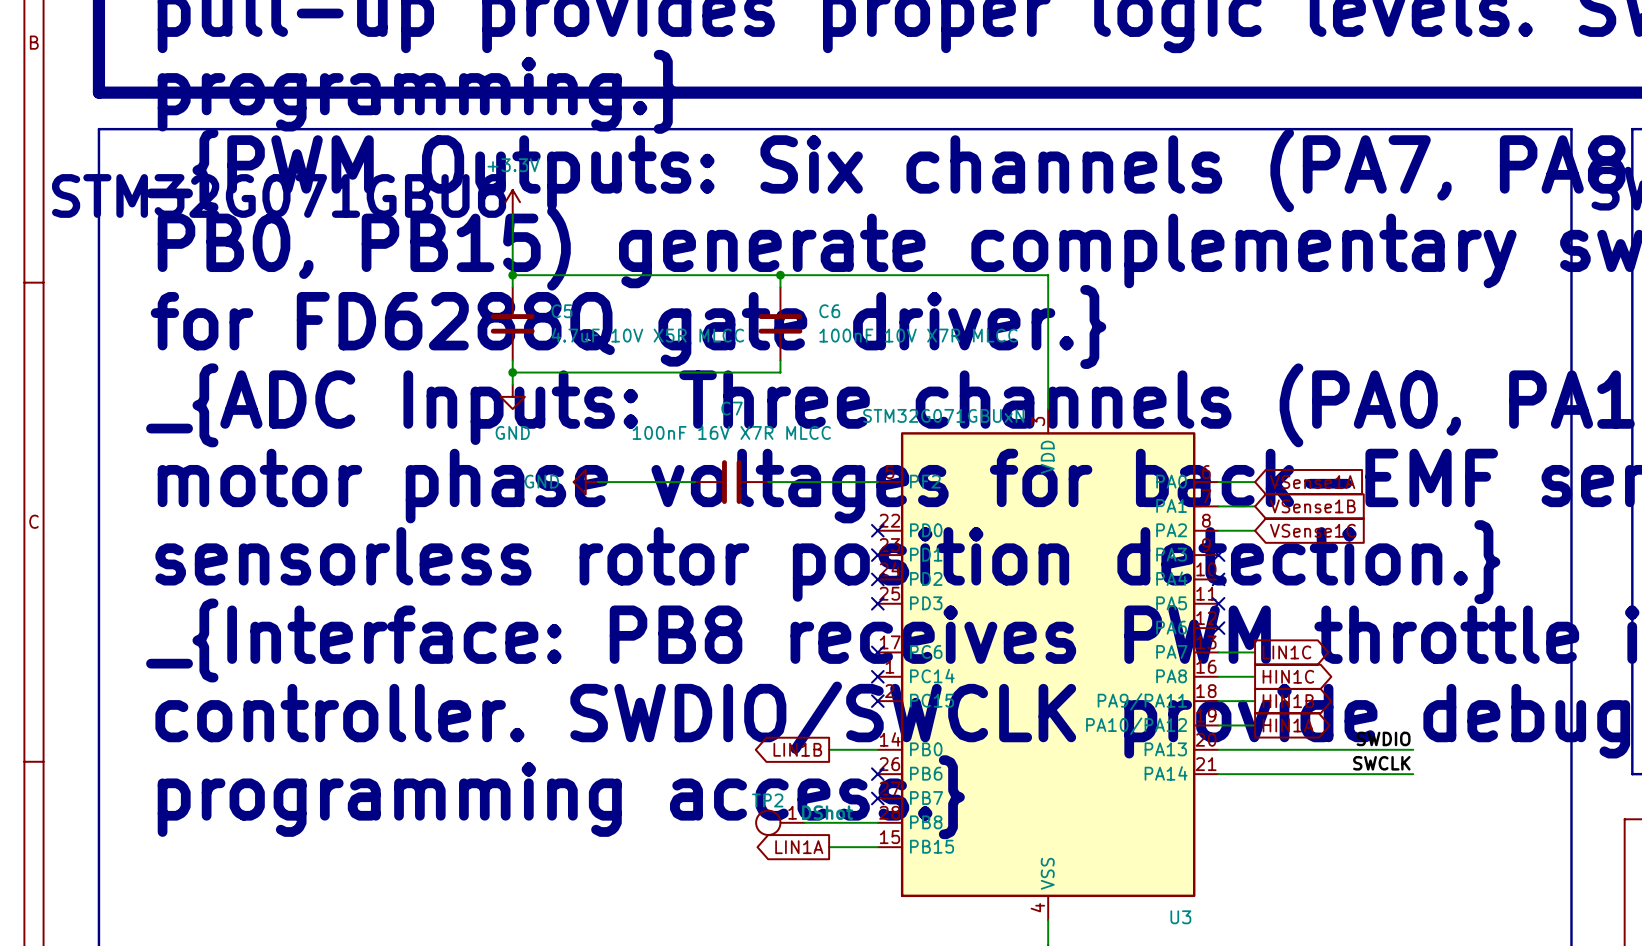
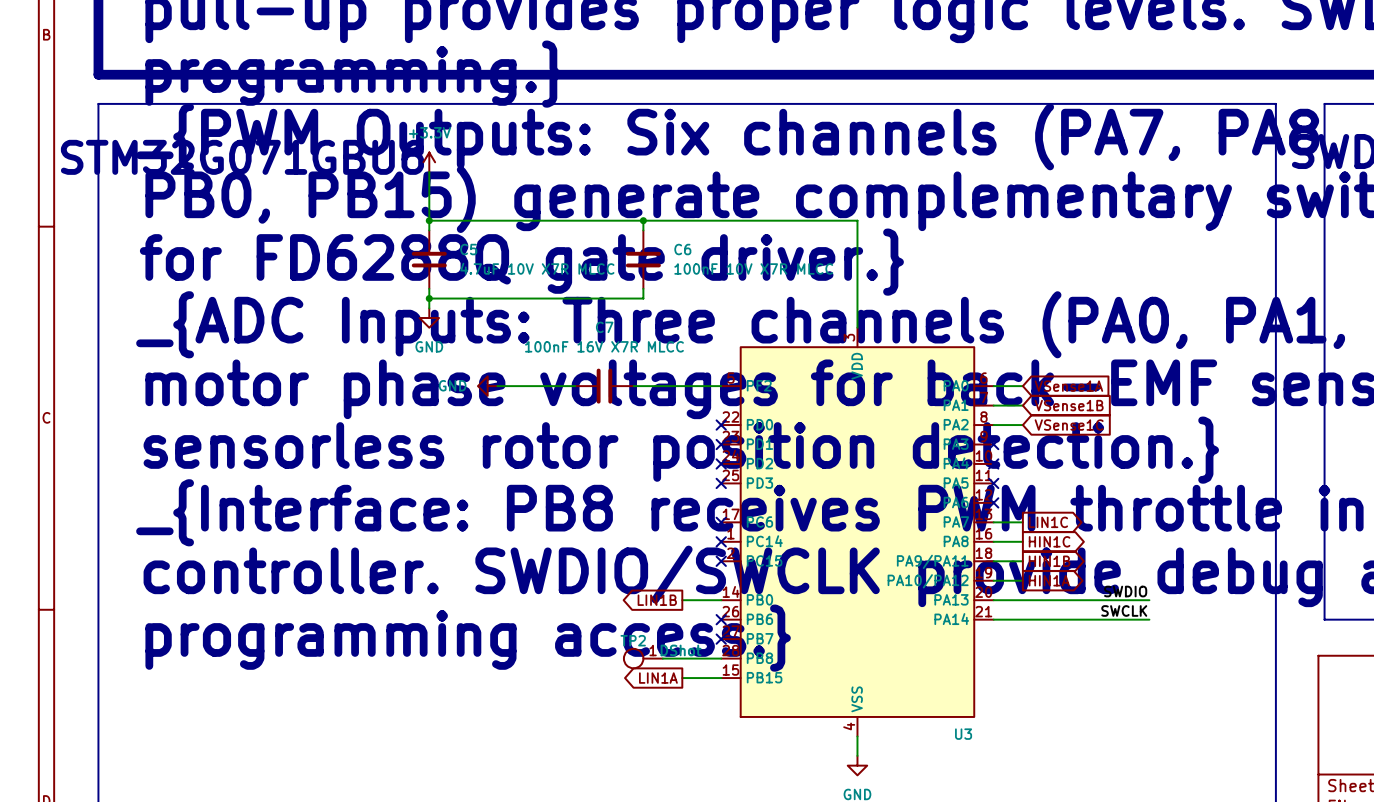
C5 value: 4.7uF 10V X5R MLCC (647, 335) -> 4.7uF 10V X7R MLCC (537, 268)
U3 value: STM32G071GBUxN (943, 415) -> none

